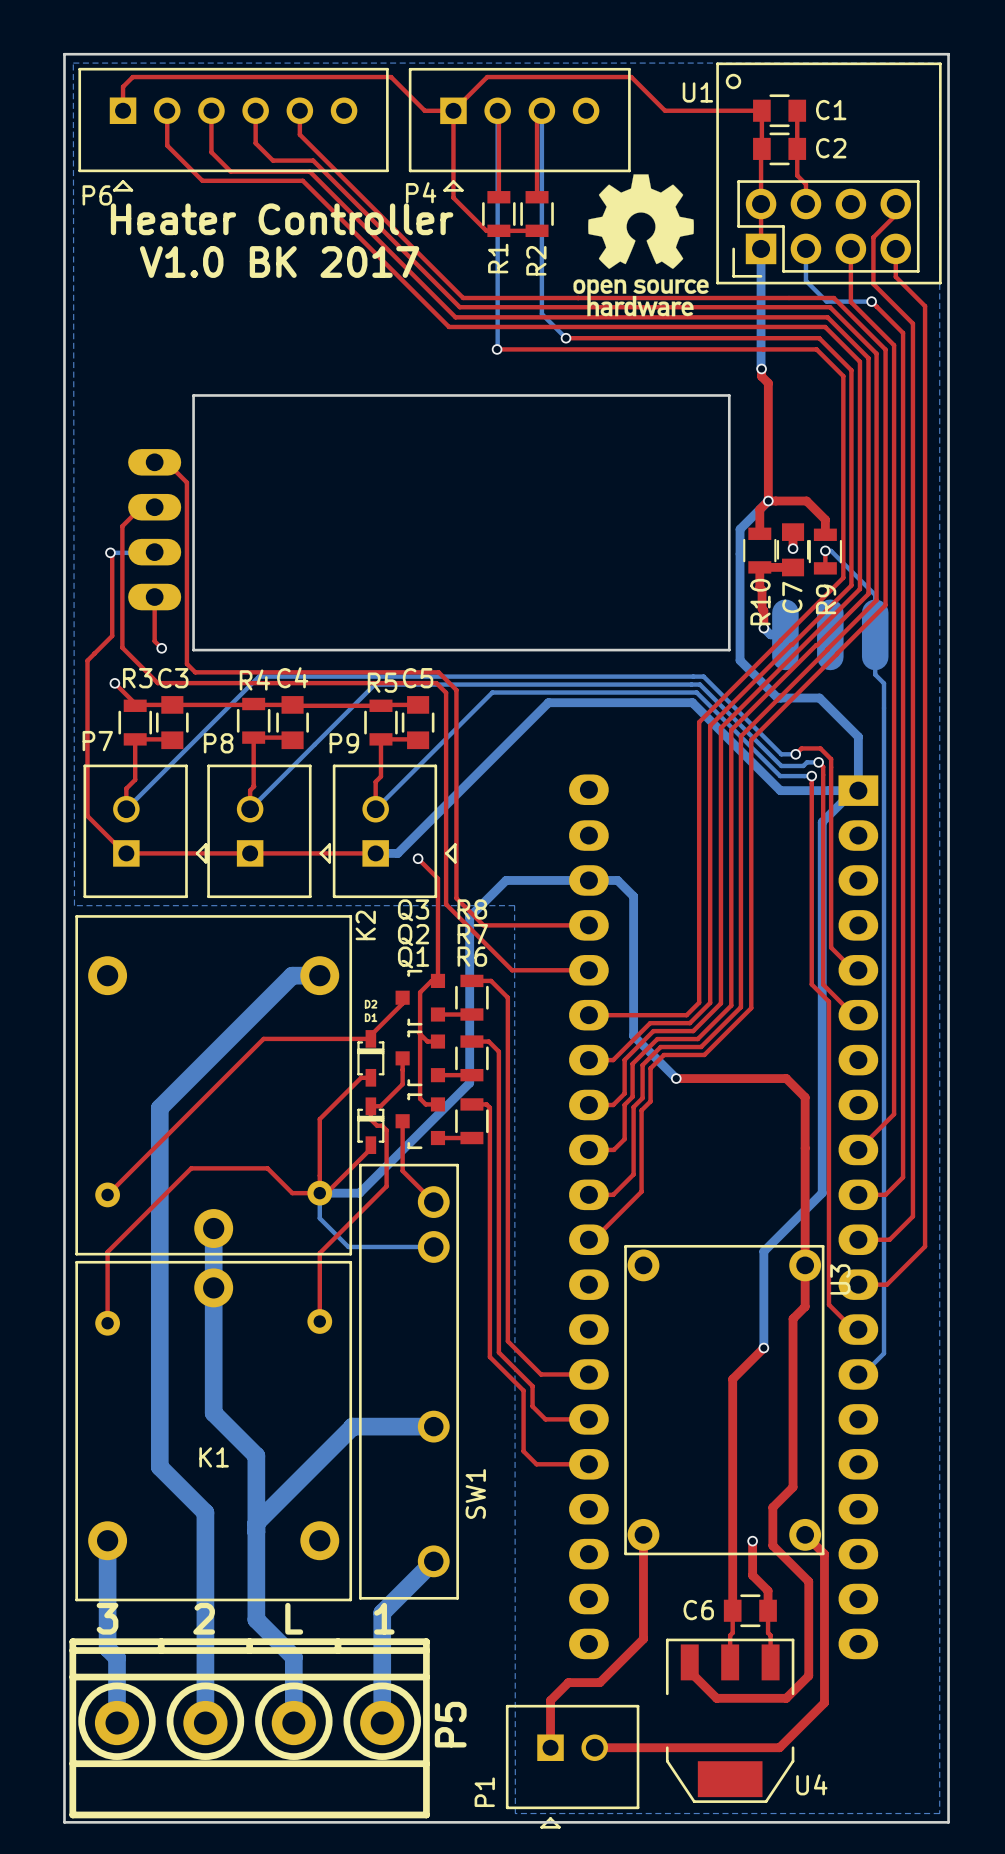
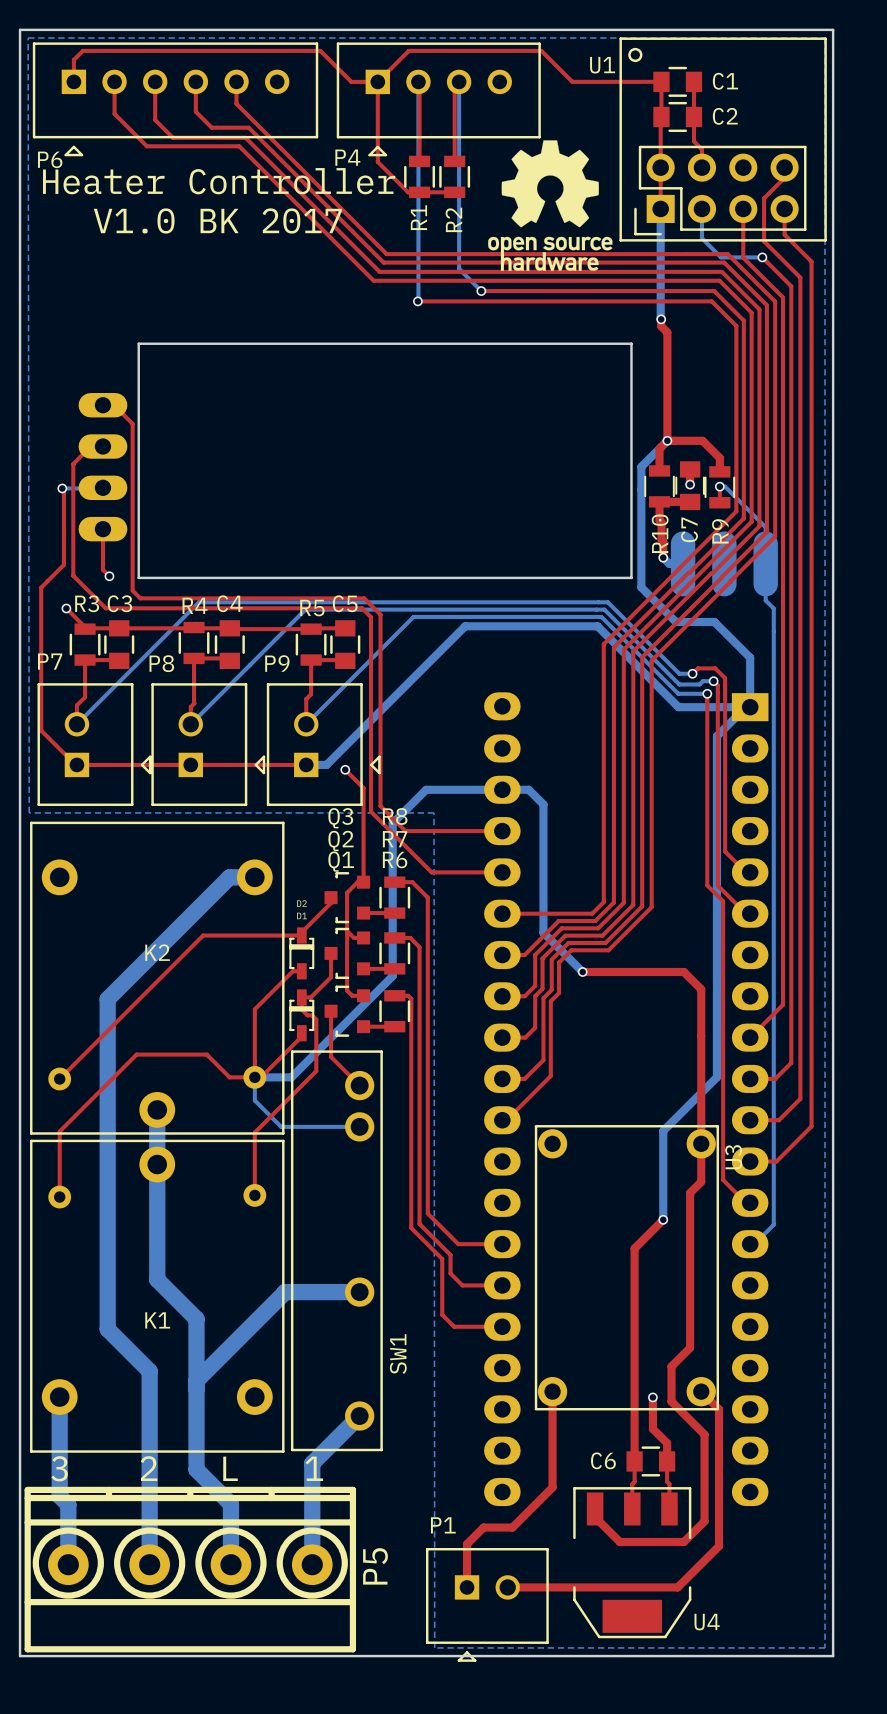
K2 name rotation: 0° (365, 925) -> 90° clockwise (157, 952)
K2 name position: K2 (365, 925) -> K2 (157, 952)
P1 name rotation: 0° (484, 1792) -> 90° clockwise (443, 1525)
P1 name position: P1 (484, 1792) -> P1 (443, 1525)

